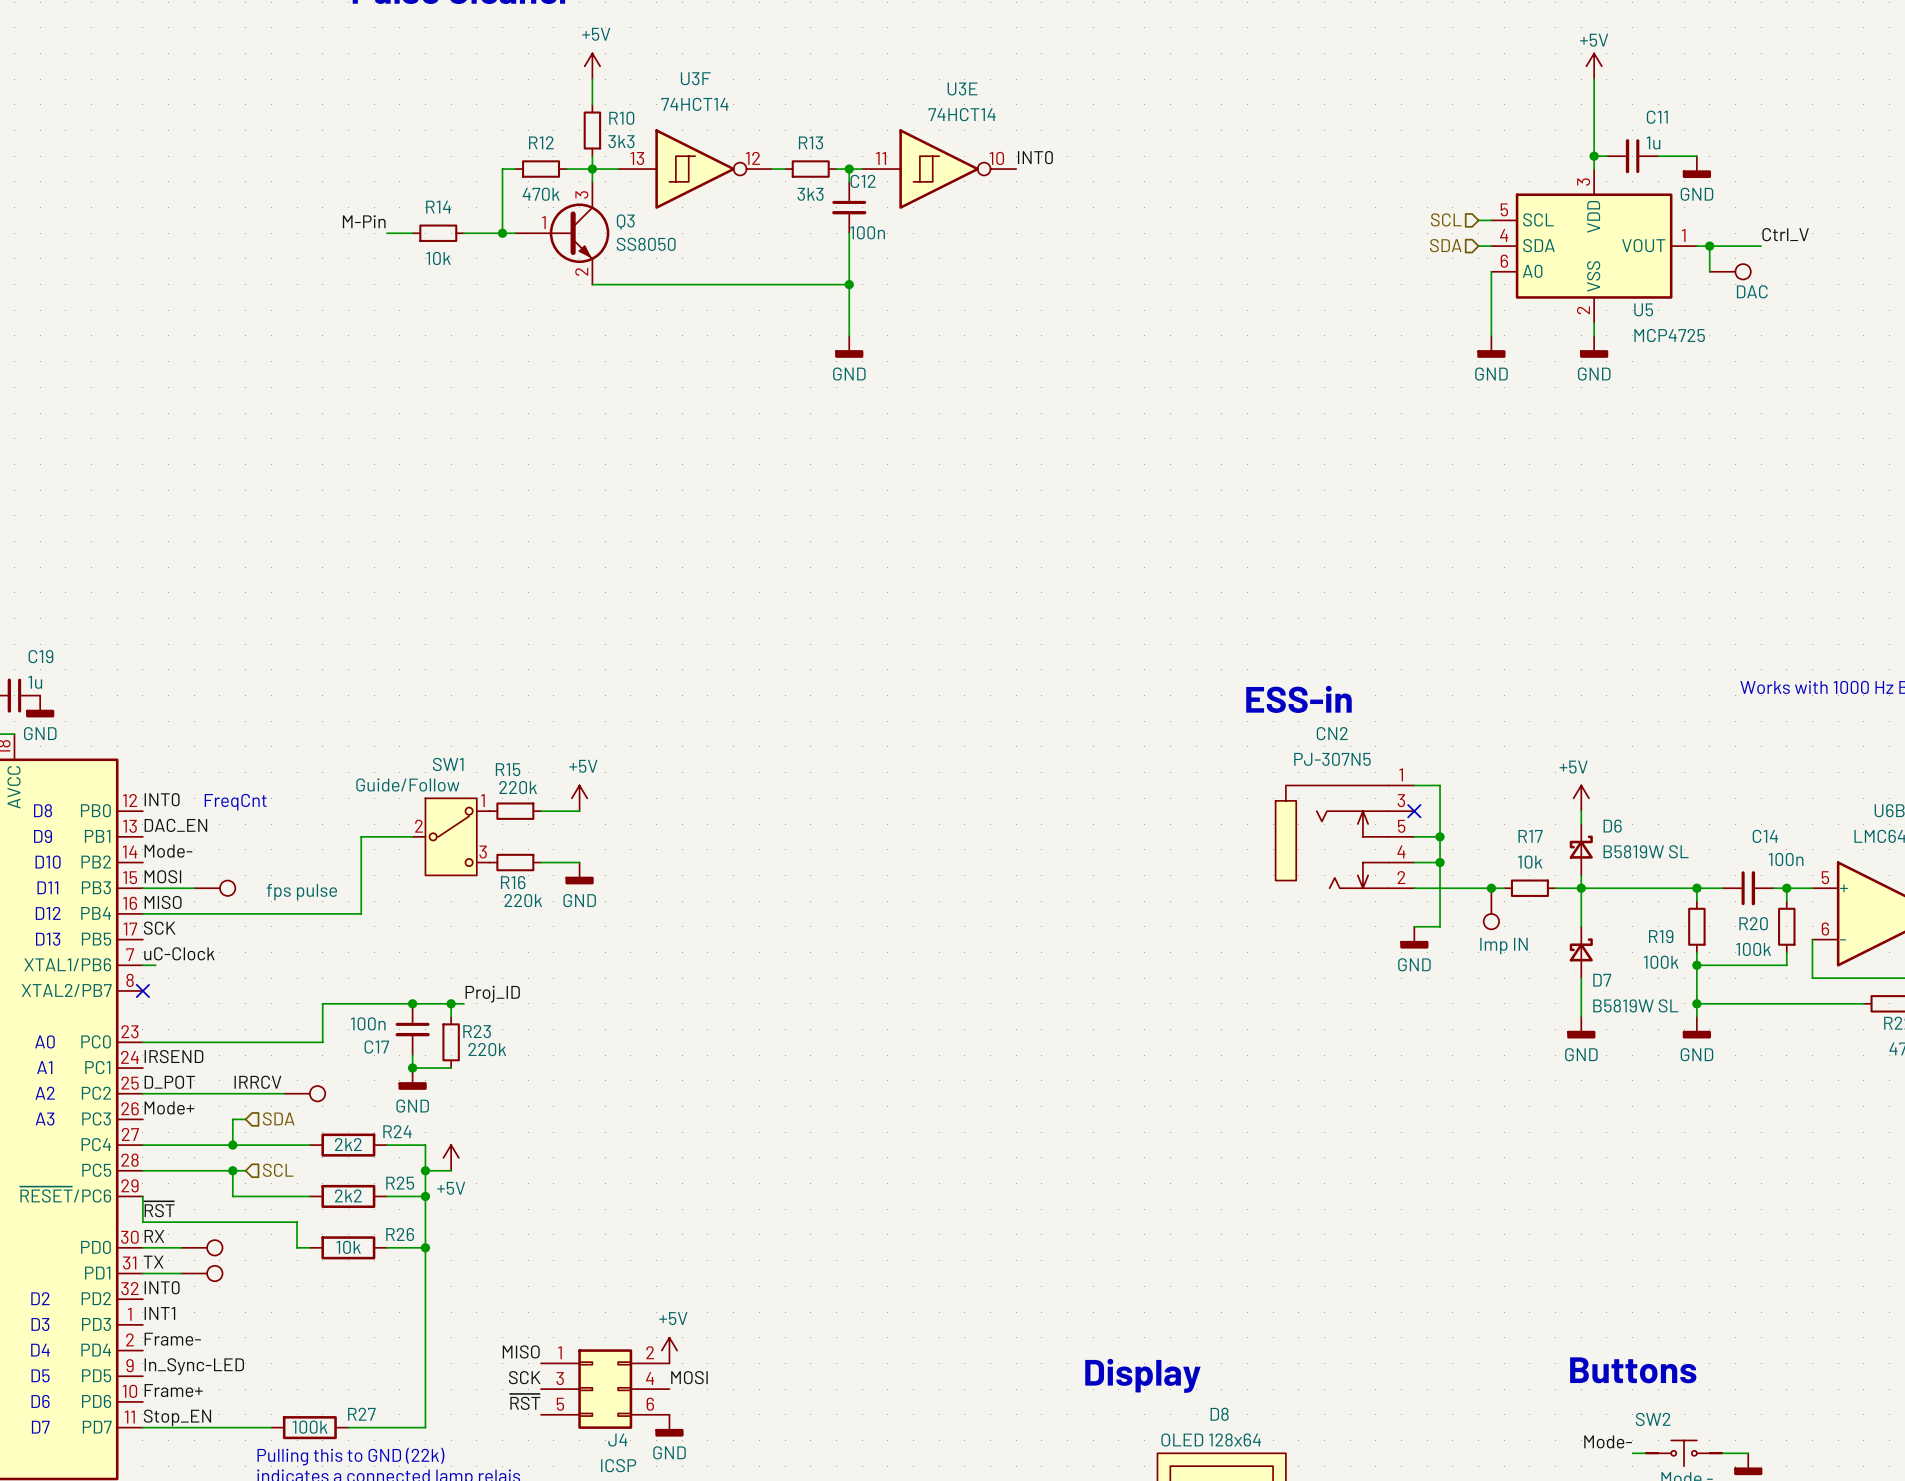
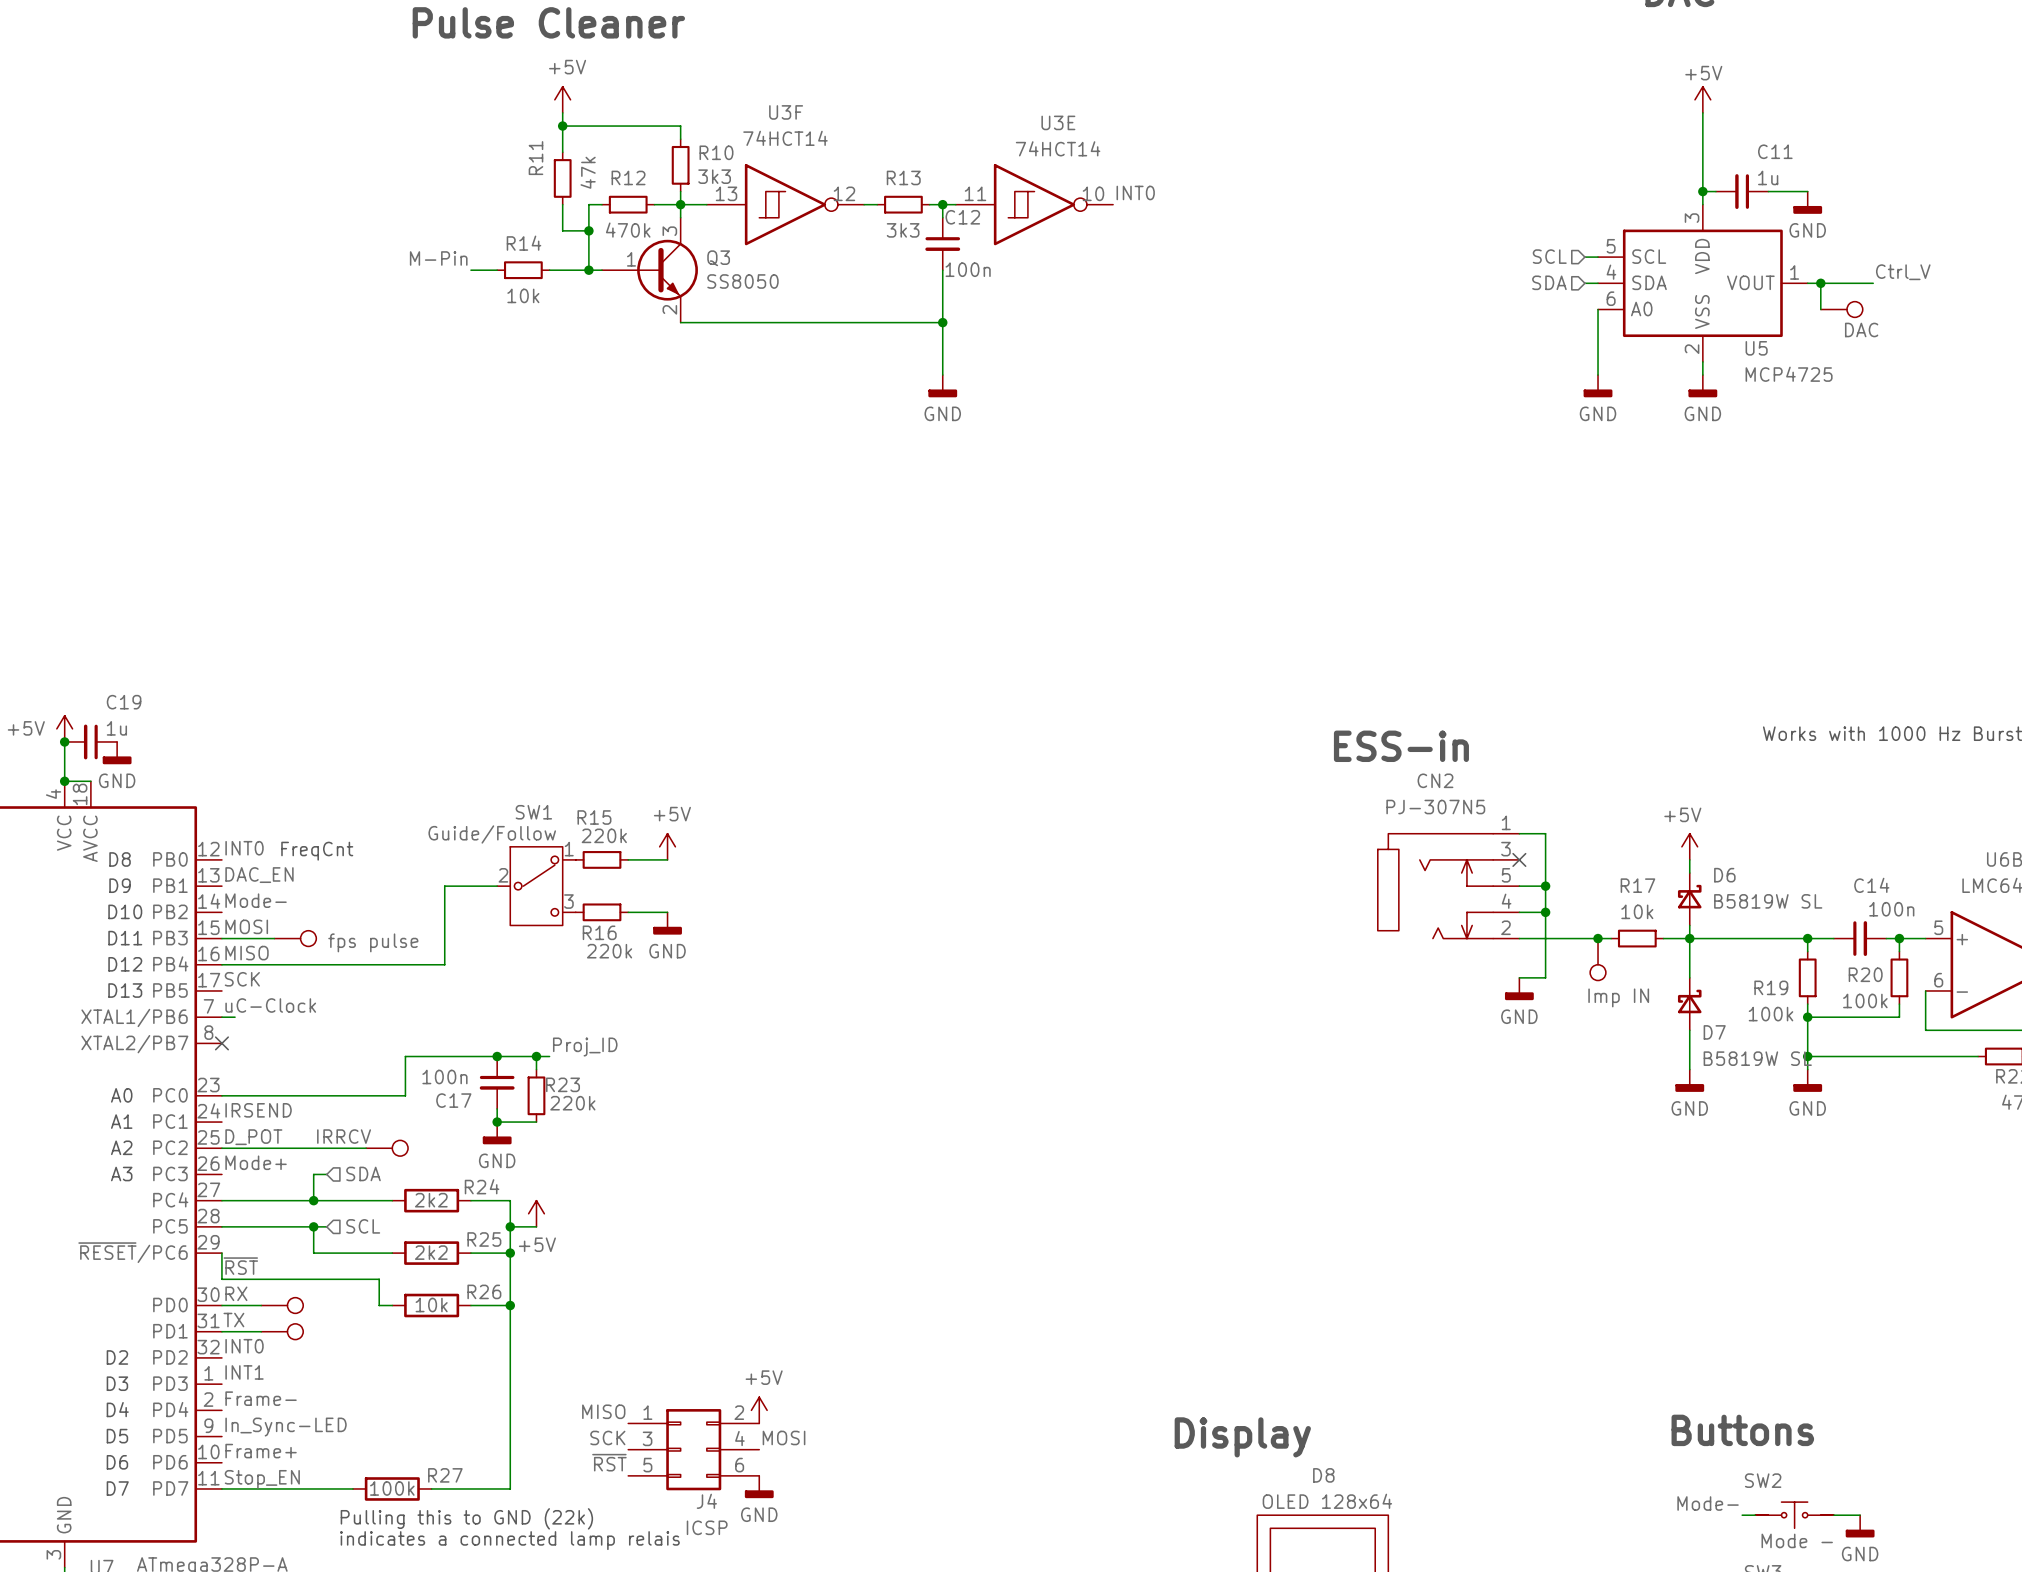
power symbol position: +5V (592, 66) -> +5V (562, 99)
wire: none -> (562, 112) (562, 152)
wire: (592, 79) (592, 91) -> (562, 126) (680, 126)
junction: none -> (562, 126)
R11: none -> 47k (562, 178)
wire: none -> (562, 204) (562, 230) (588, 230)
junction: none -> (588, 230)

